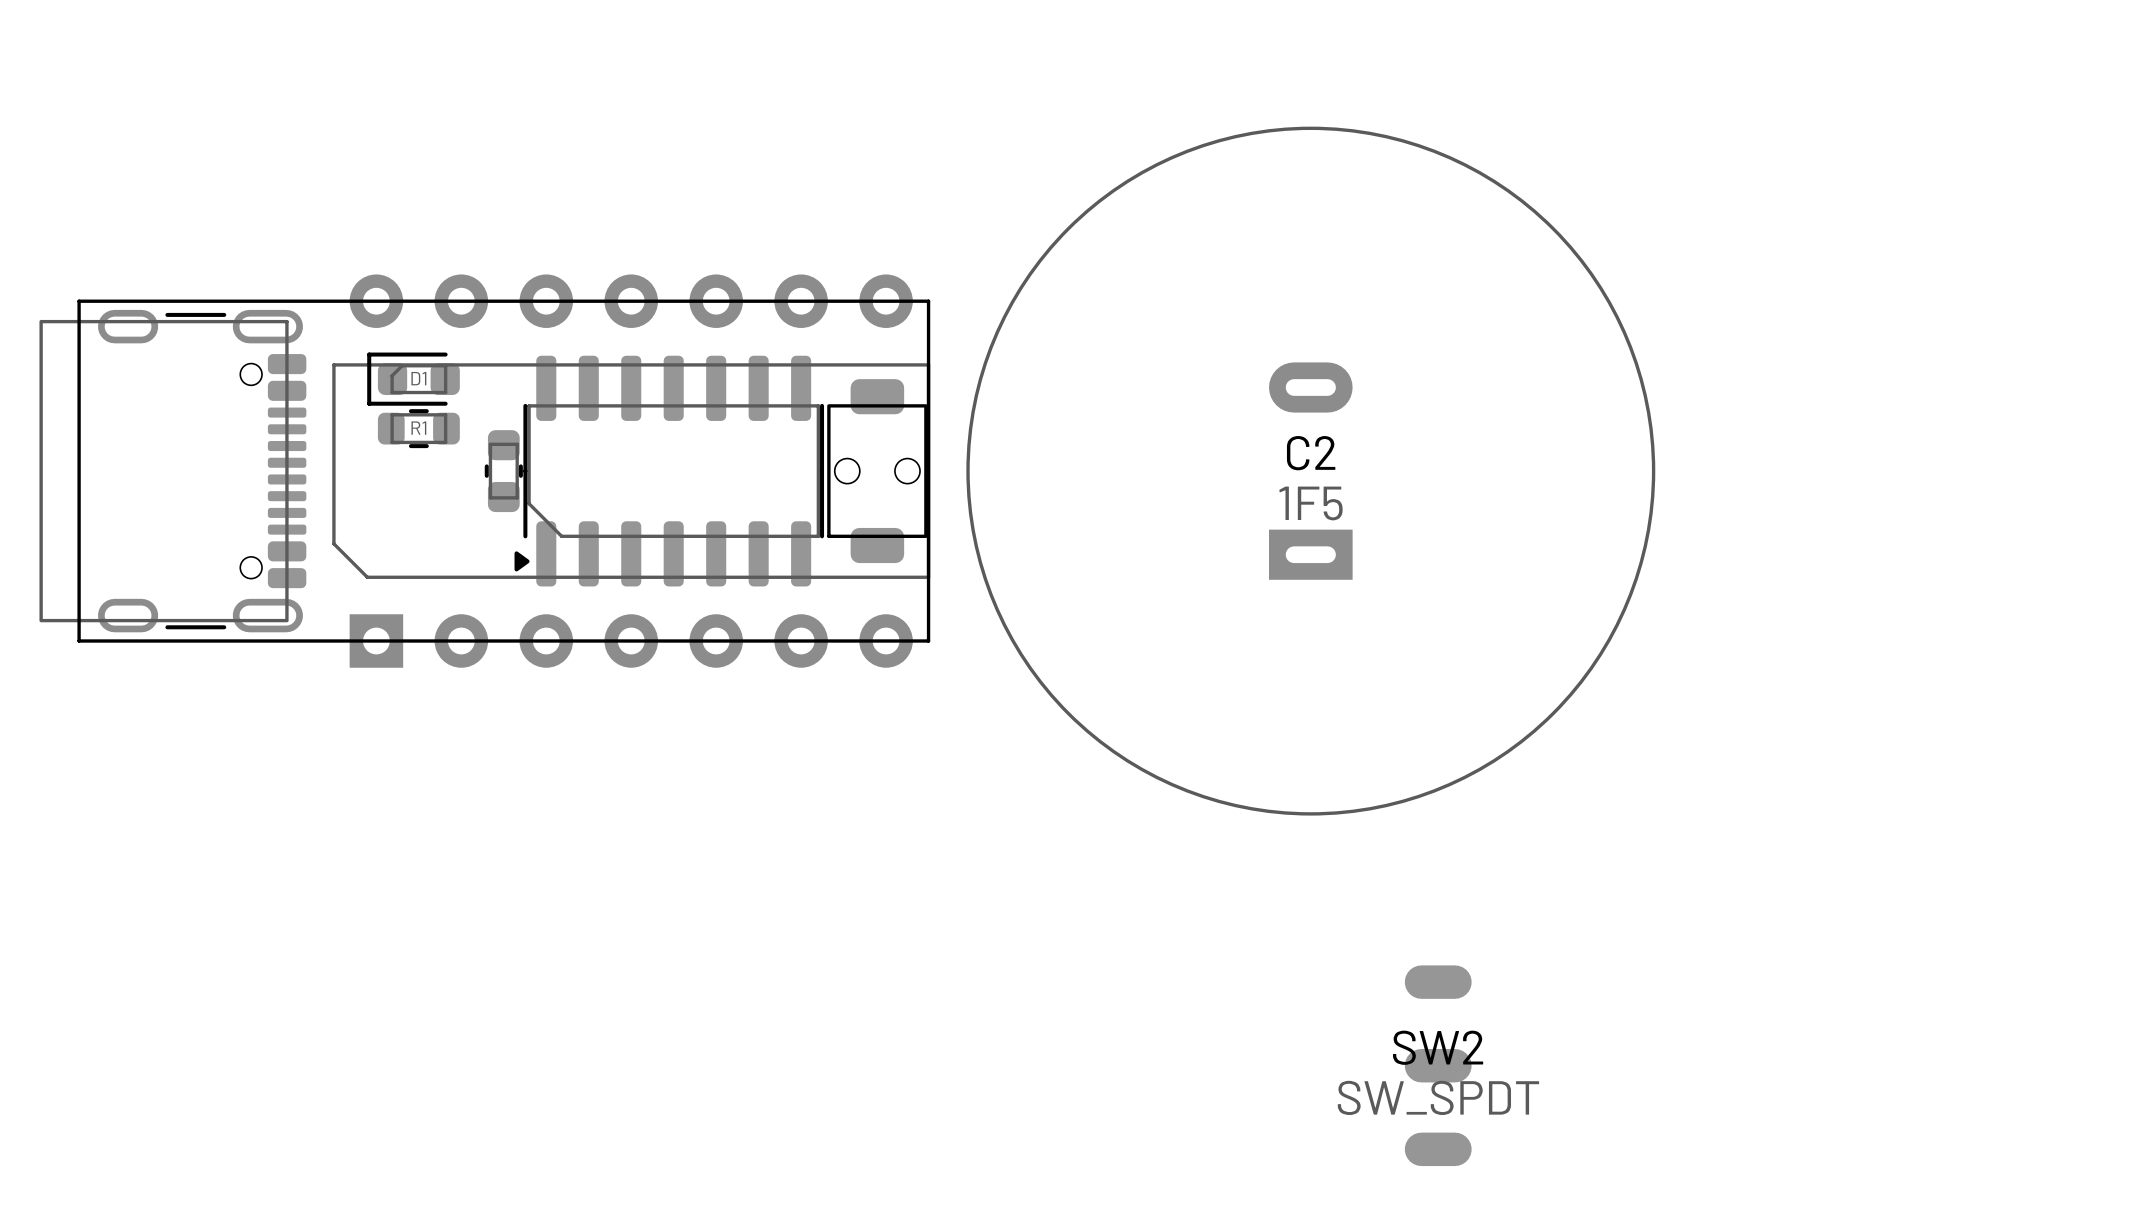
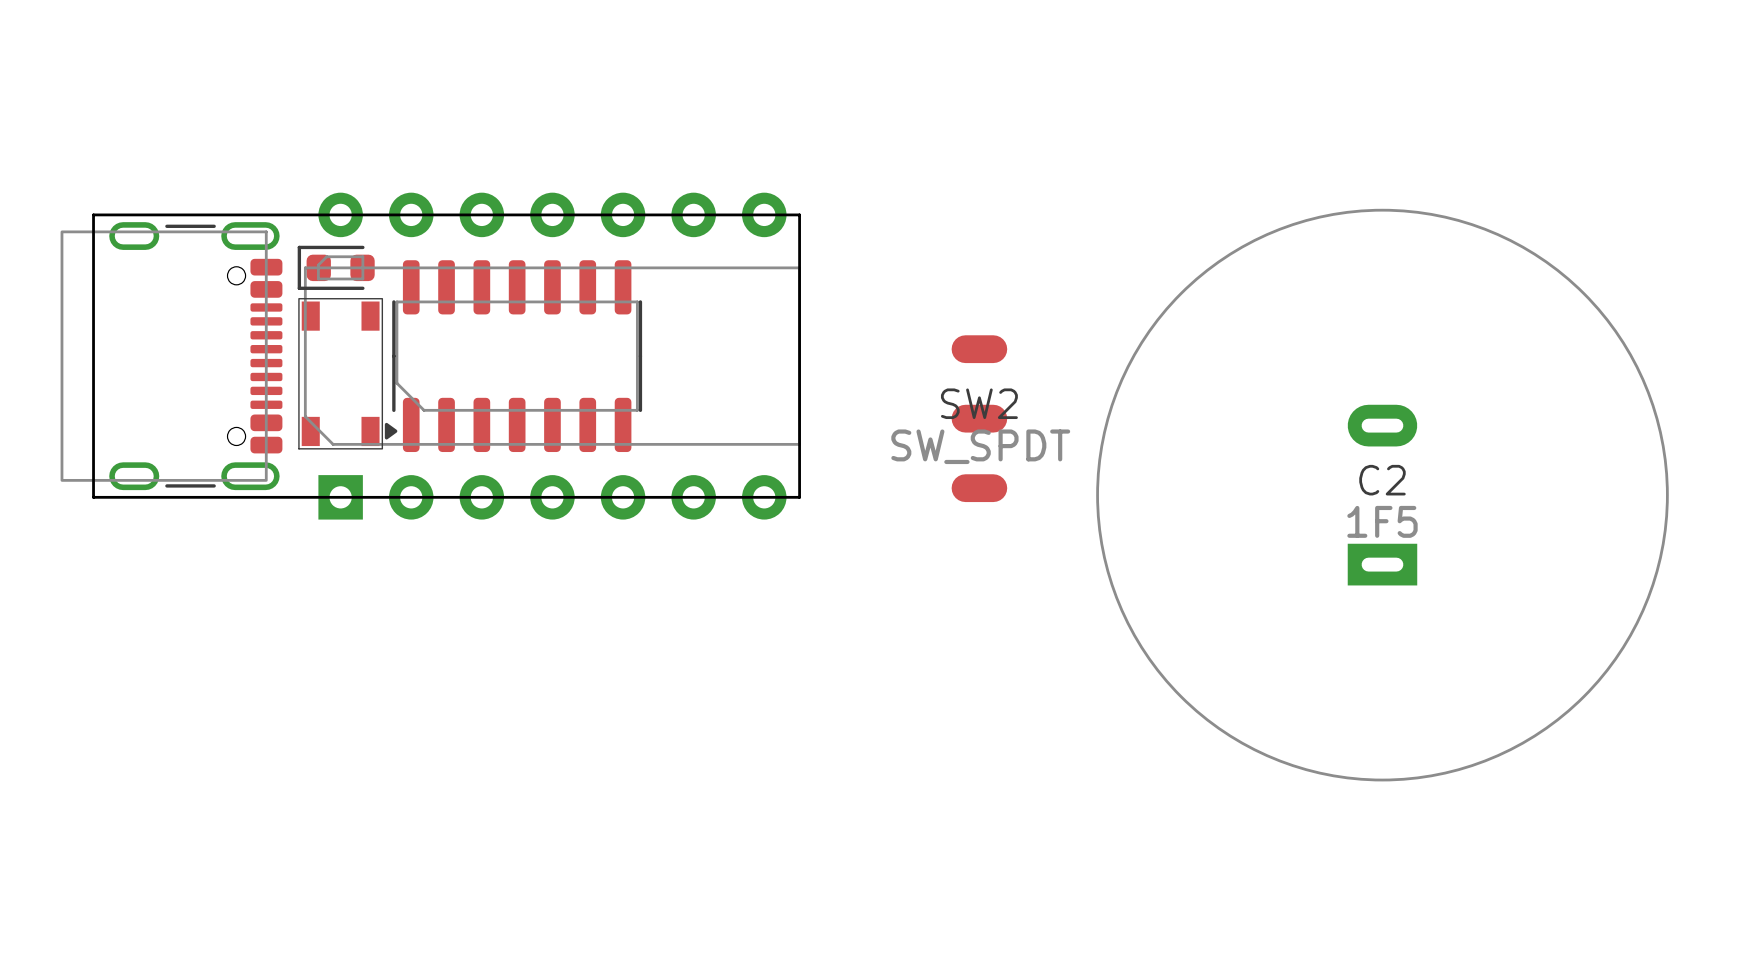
part: none -> (336, 267)
D1: (413, 379) -> none
R1: (418, 428) -> none
part: (503, 471) -> none
part position: (669, 471) -> (513, 356)
part: (877, 471) -> none
C2 position: (1310, 471) -> (1382, 495)
part: none -> (340, 373)
SW2 position: (1438, 1065) -> (979, 418)

